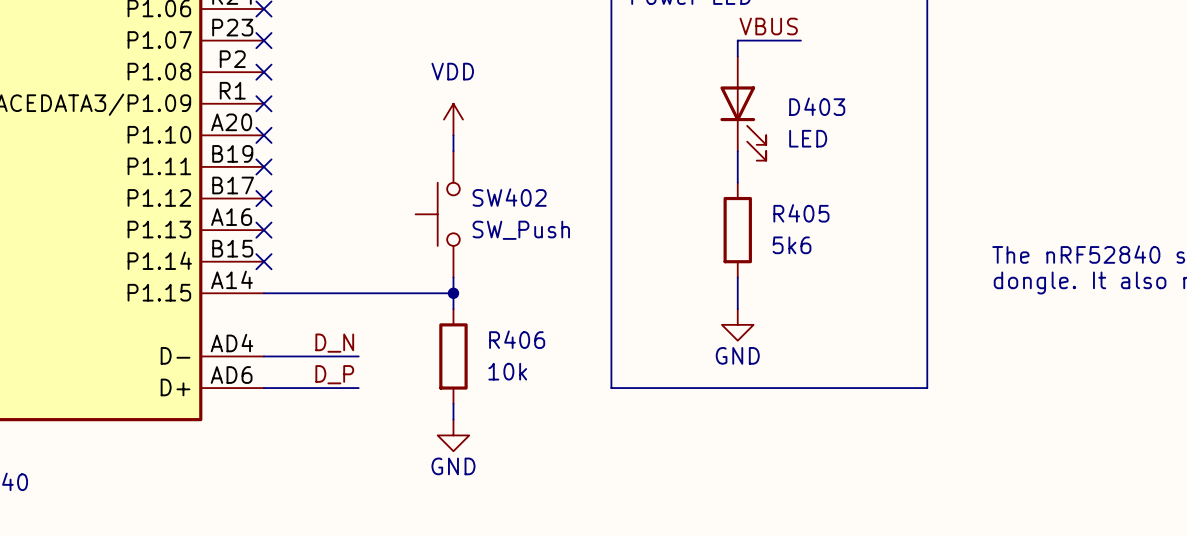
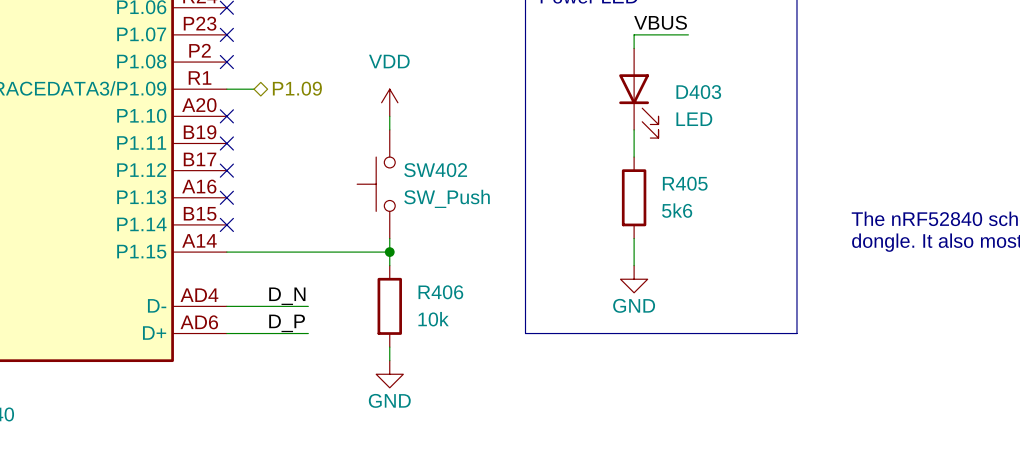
wire: none -> (226, 89) (254, 89)
no-connect mark: (263, 103) -> none
hierarchical label: none -> P1.09 (297, 88)

